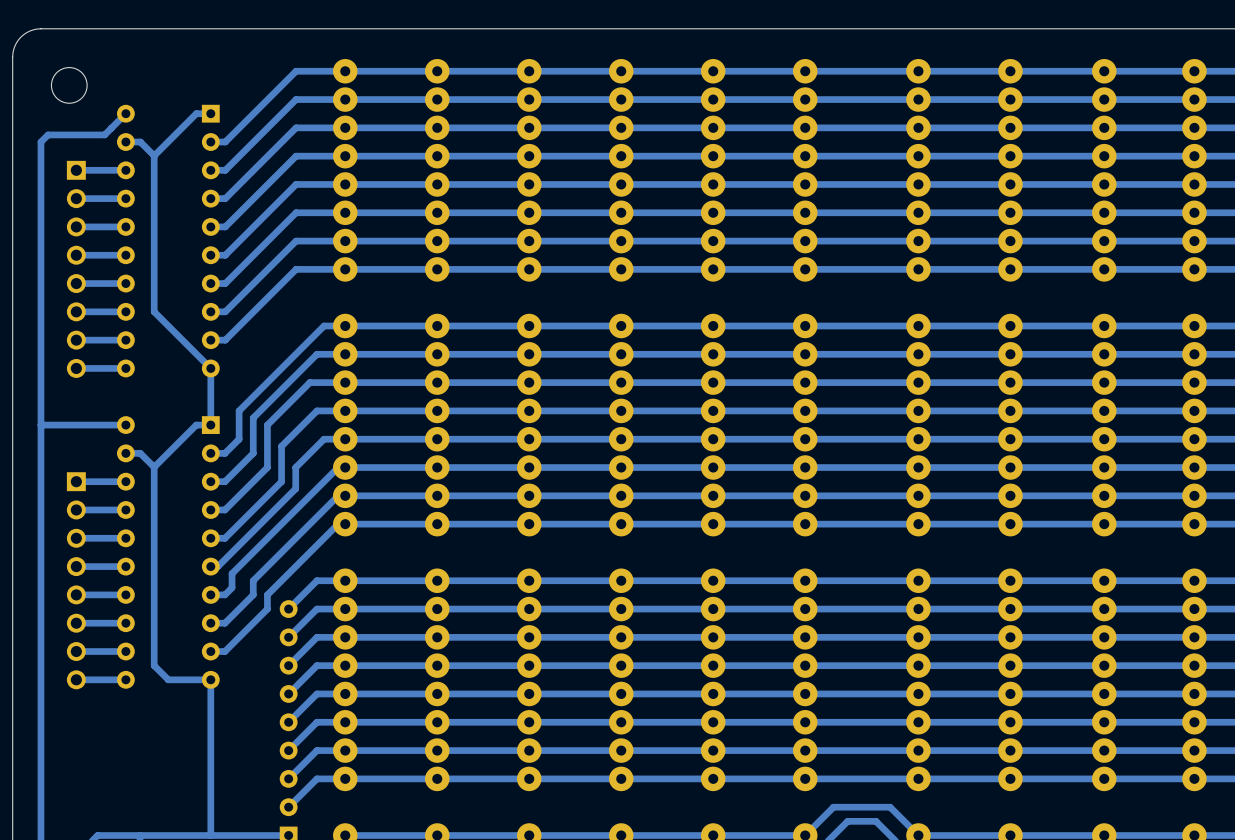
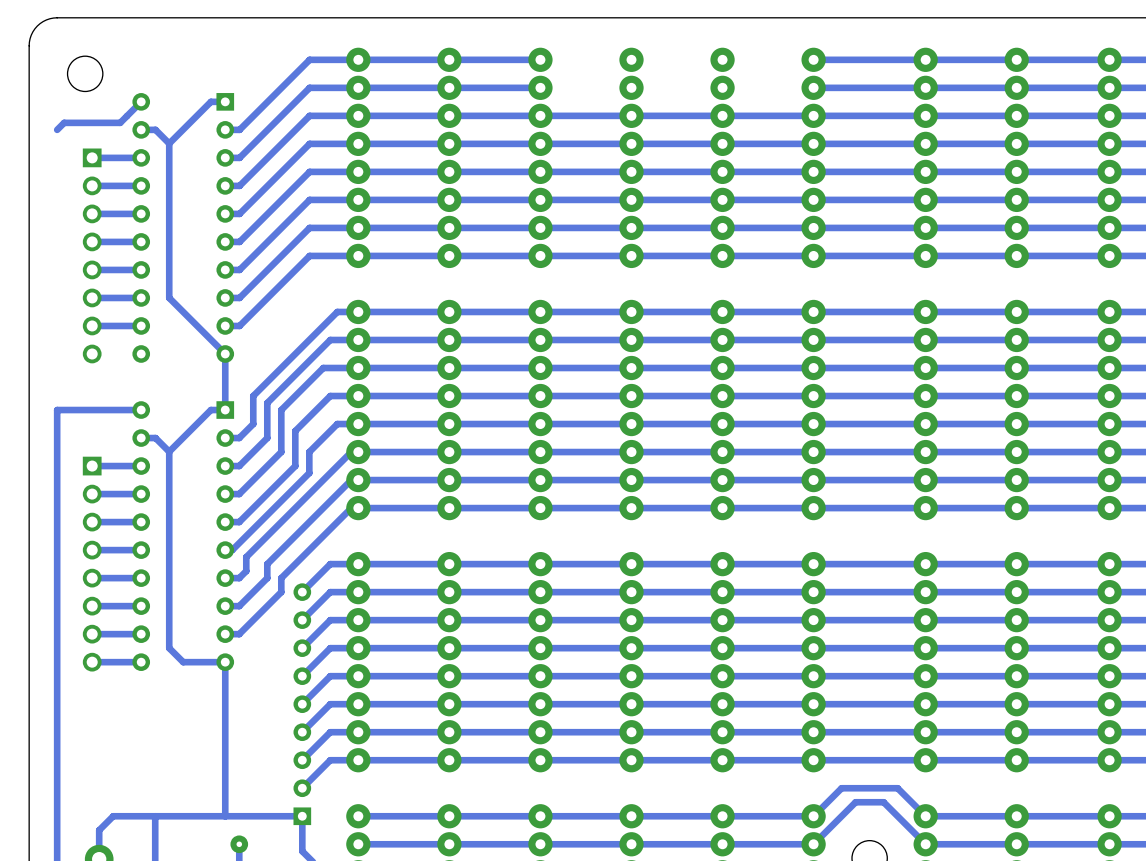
track: (805, 71) (529, 71) -> none
track: (805, 99) (529, 99) -> none
track: (40, 142) (40, 425) -> none
track: (125, 368) (76, 368) -> none

